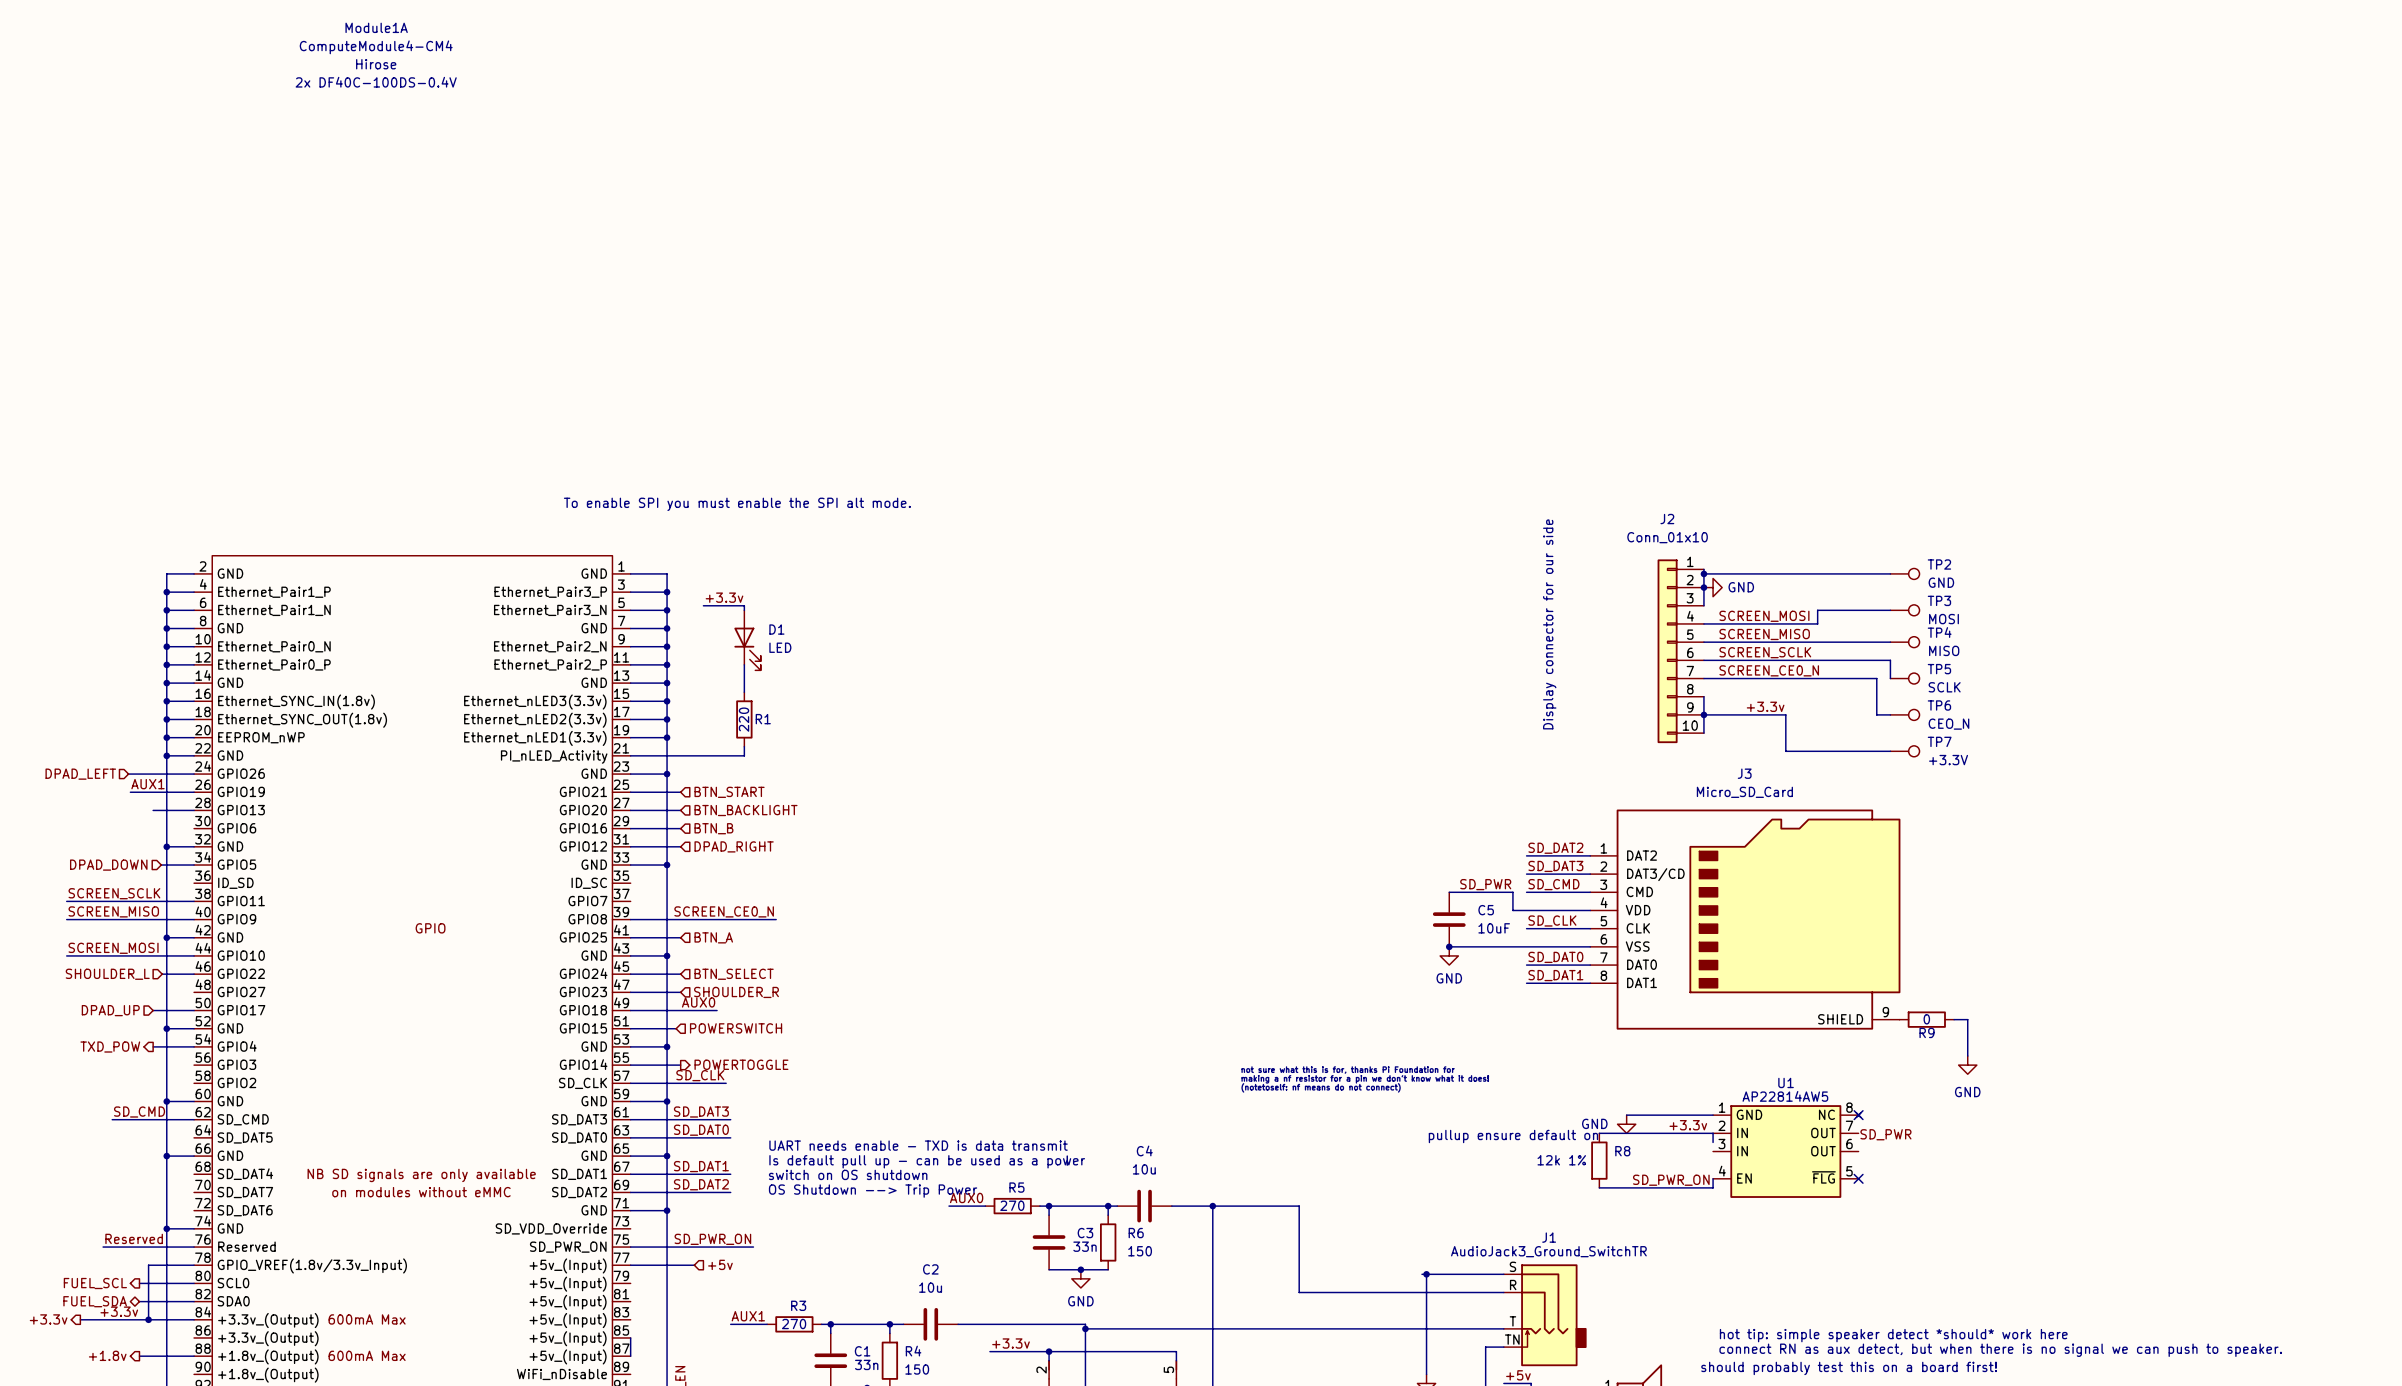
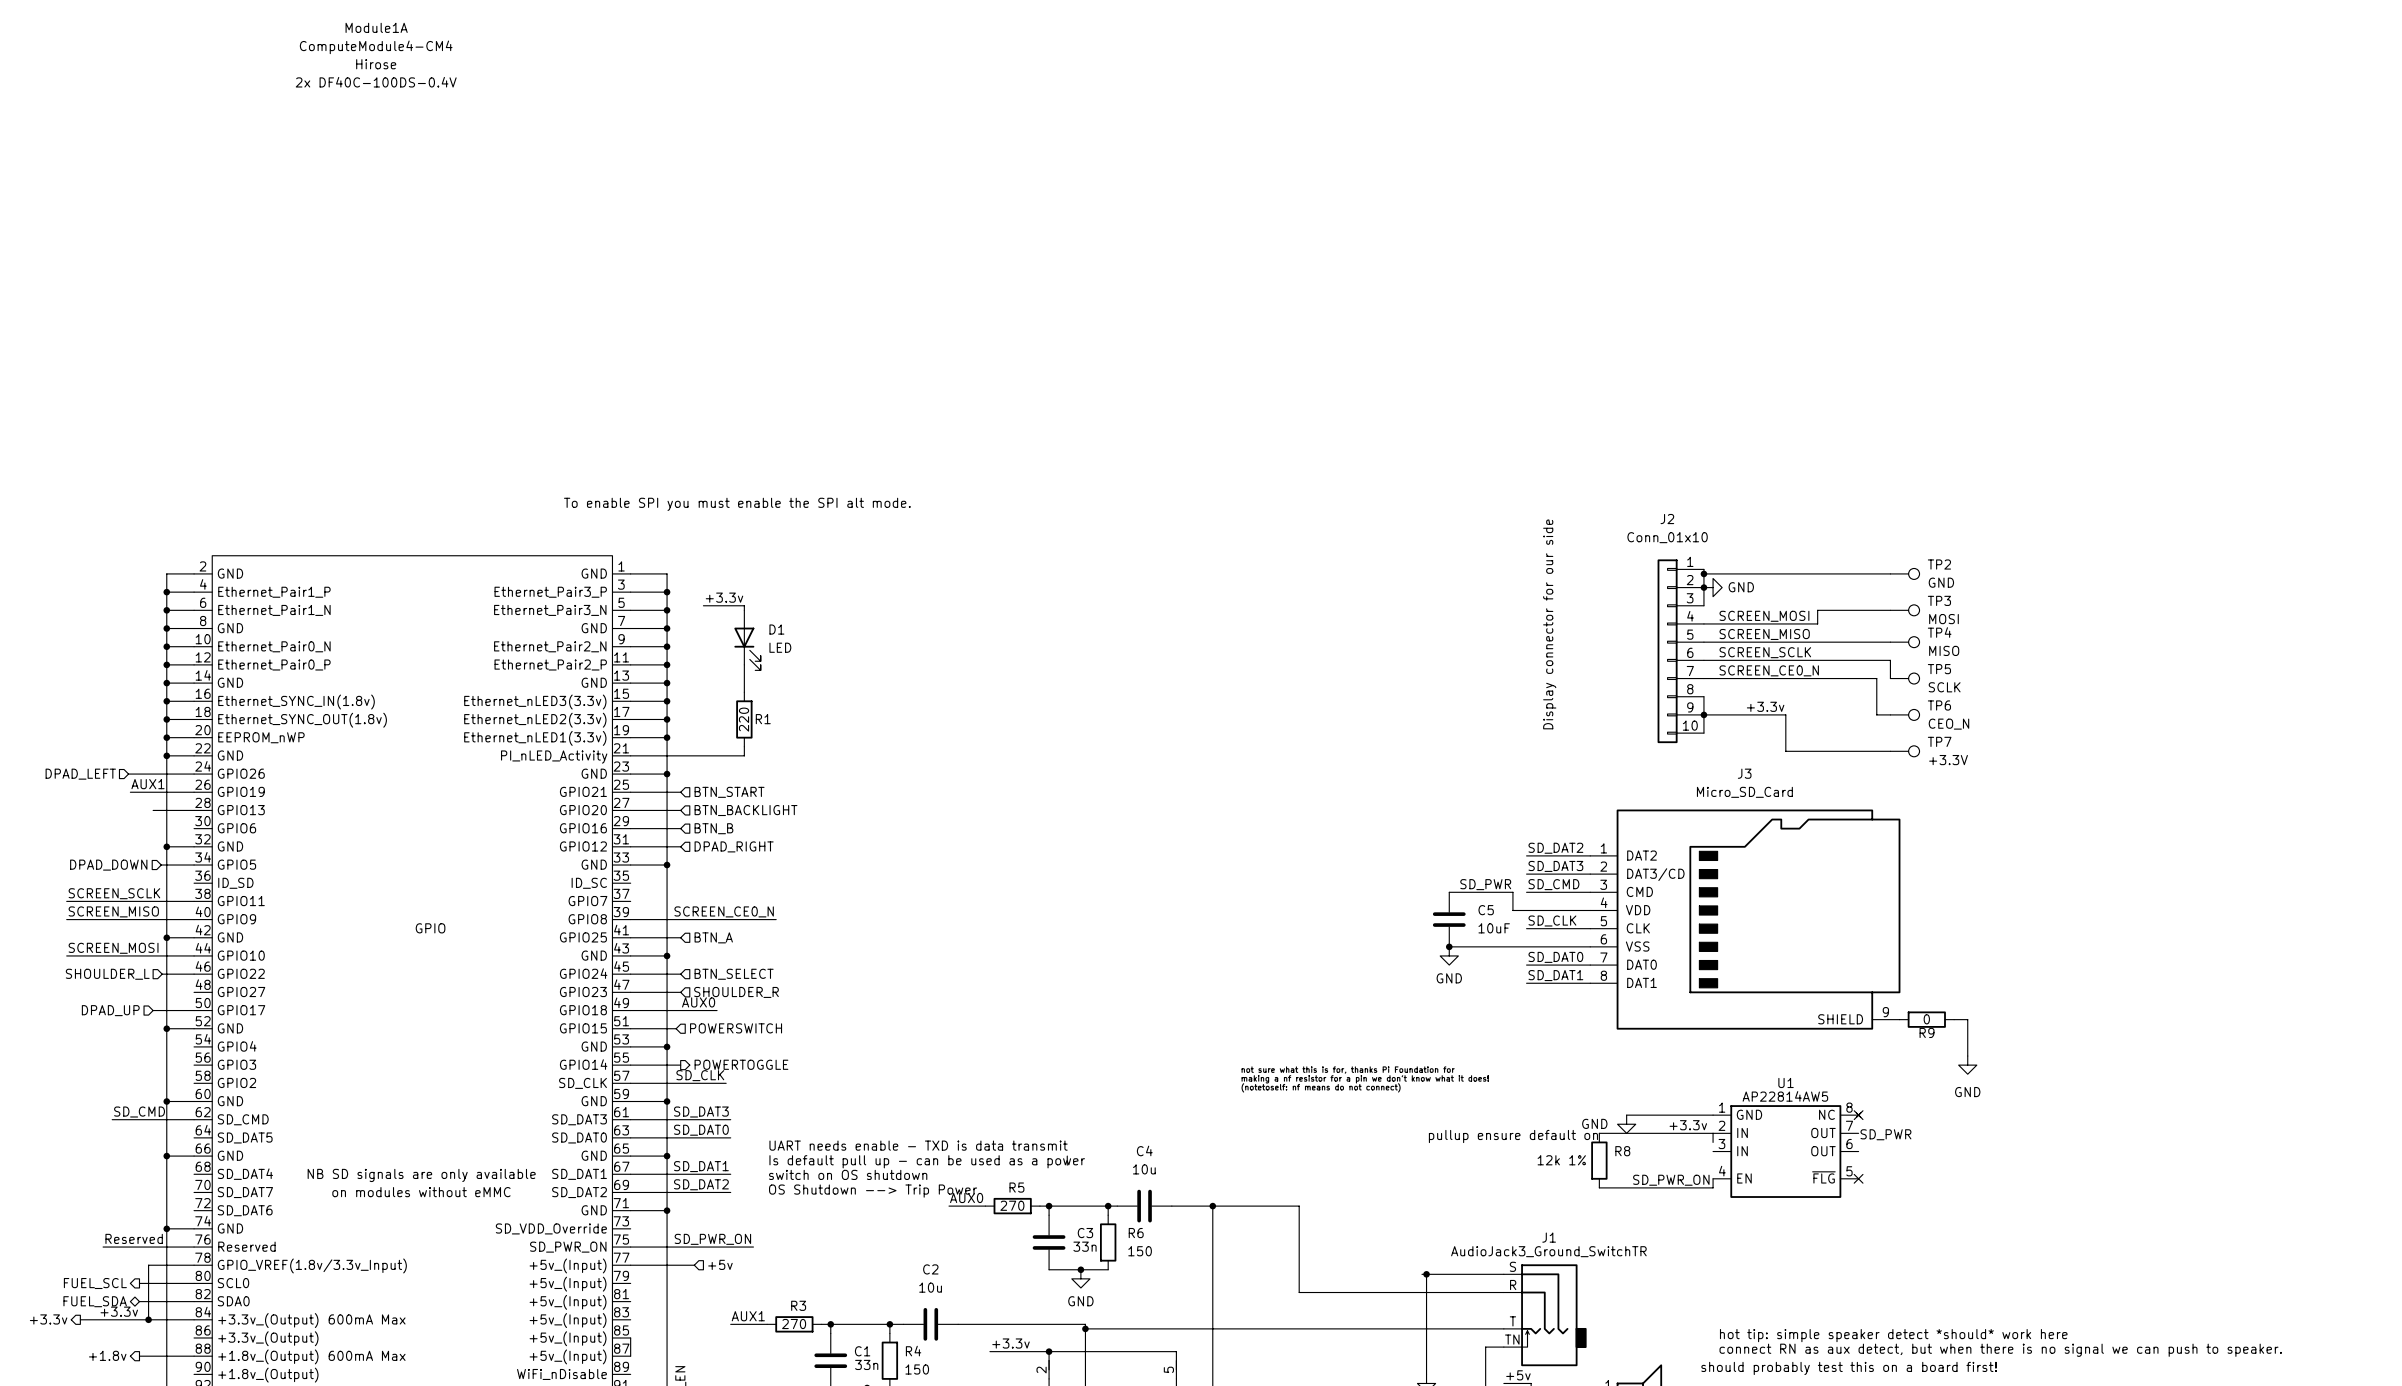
wire: (153, 1046) (194, 1046) -> none
hierarchical label: TXD_POW (110, 1047) -> none

